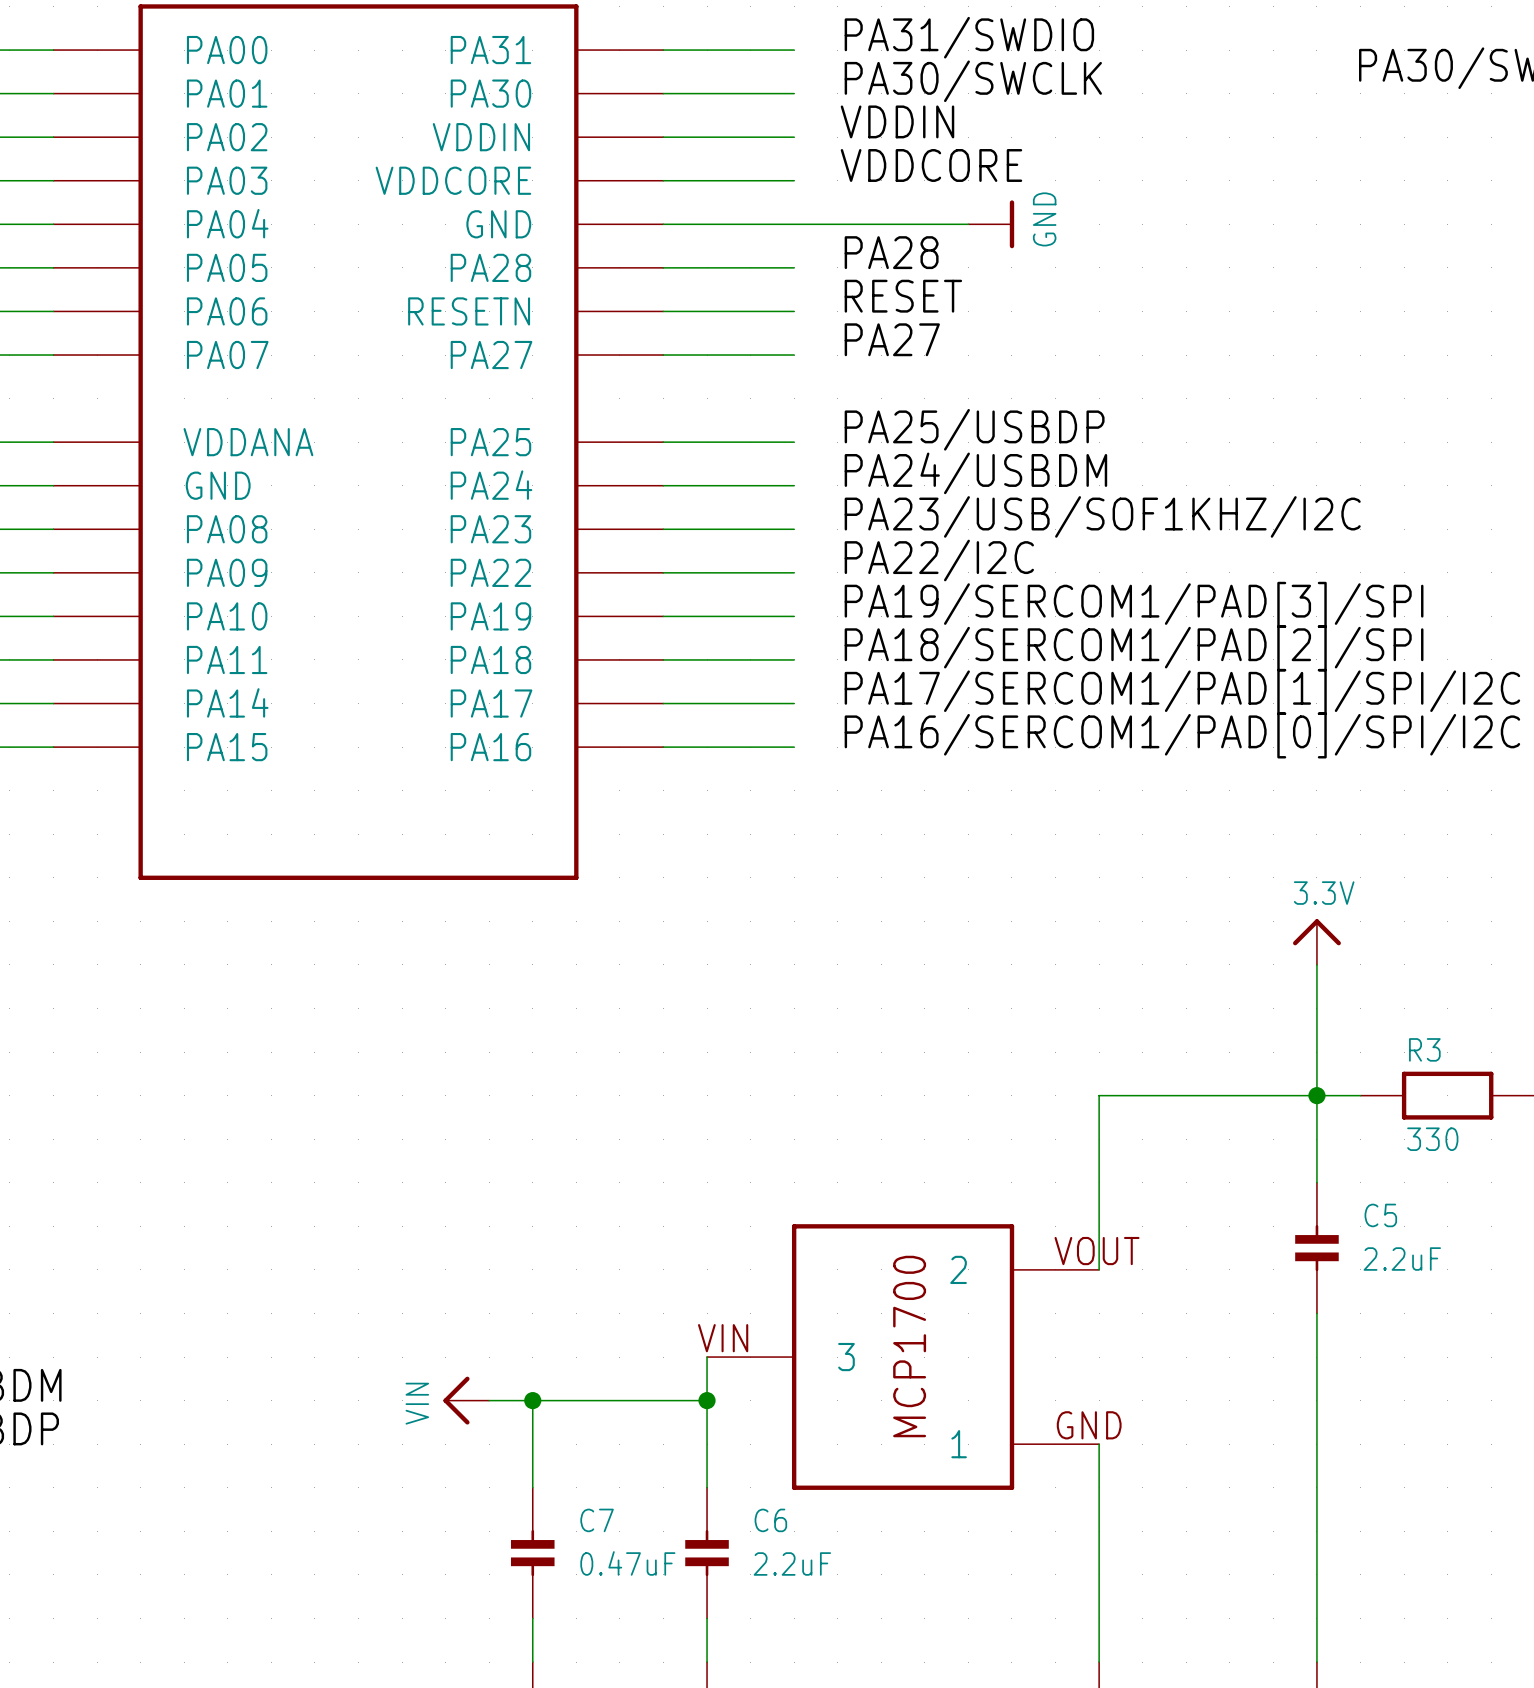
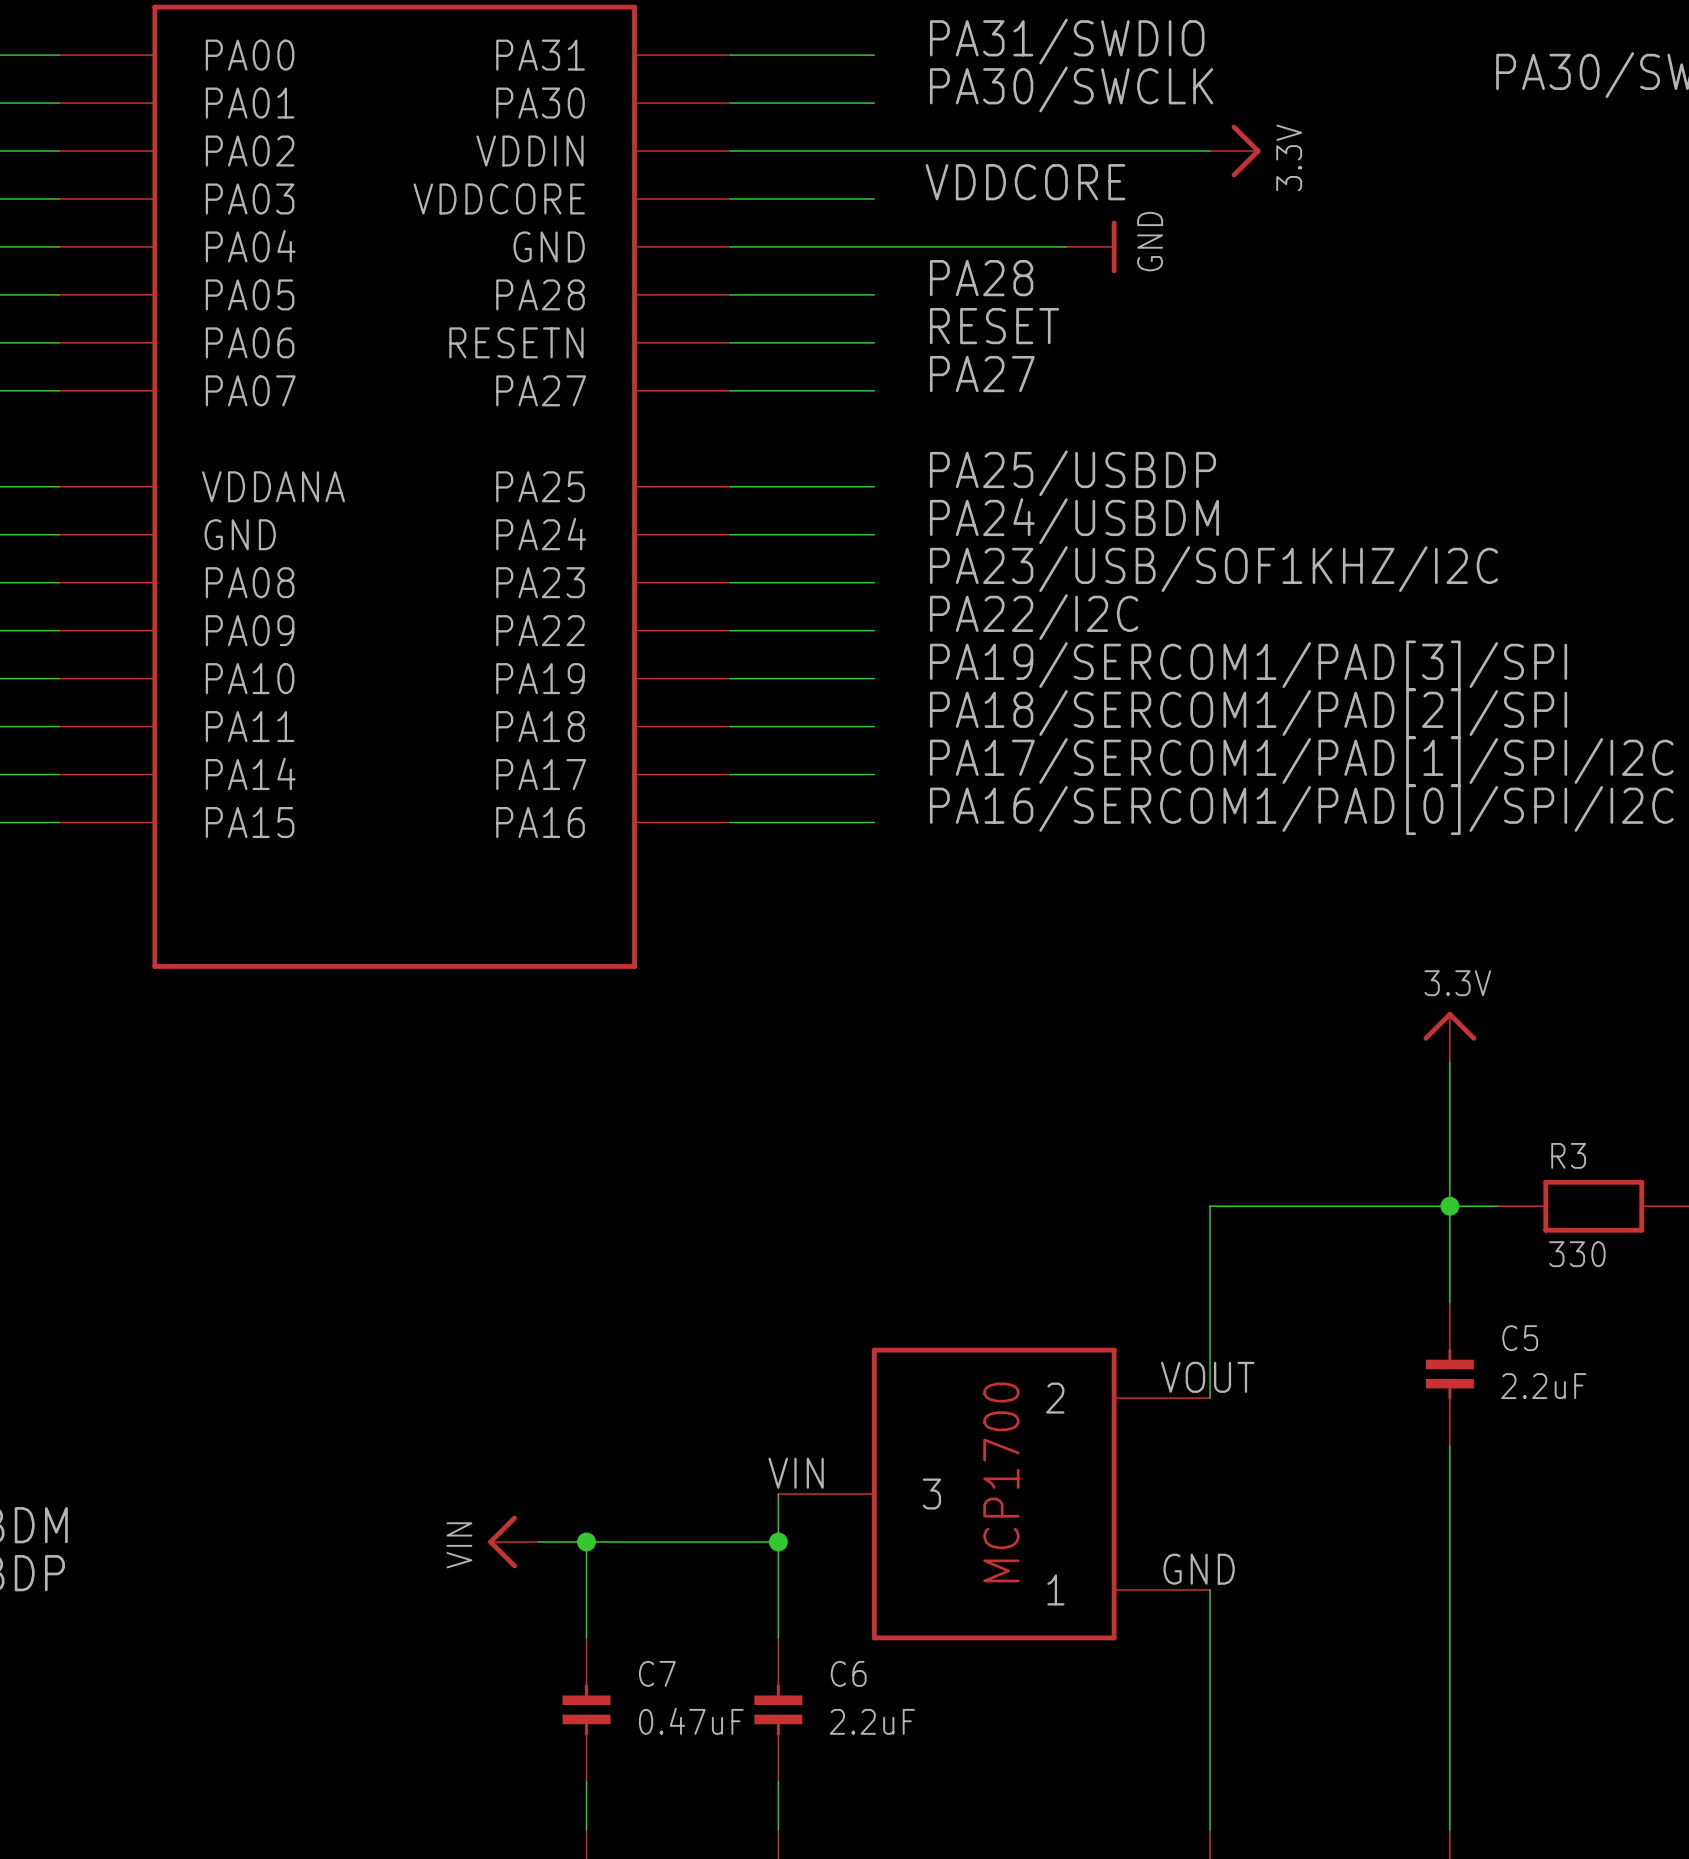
label: VDDIN (897, 121) -> none
wire: none -> (874, 151) (1210, 151)
power symbol: none -> 3.3V (1235, 151)

